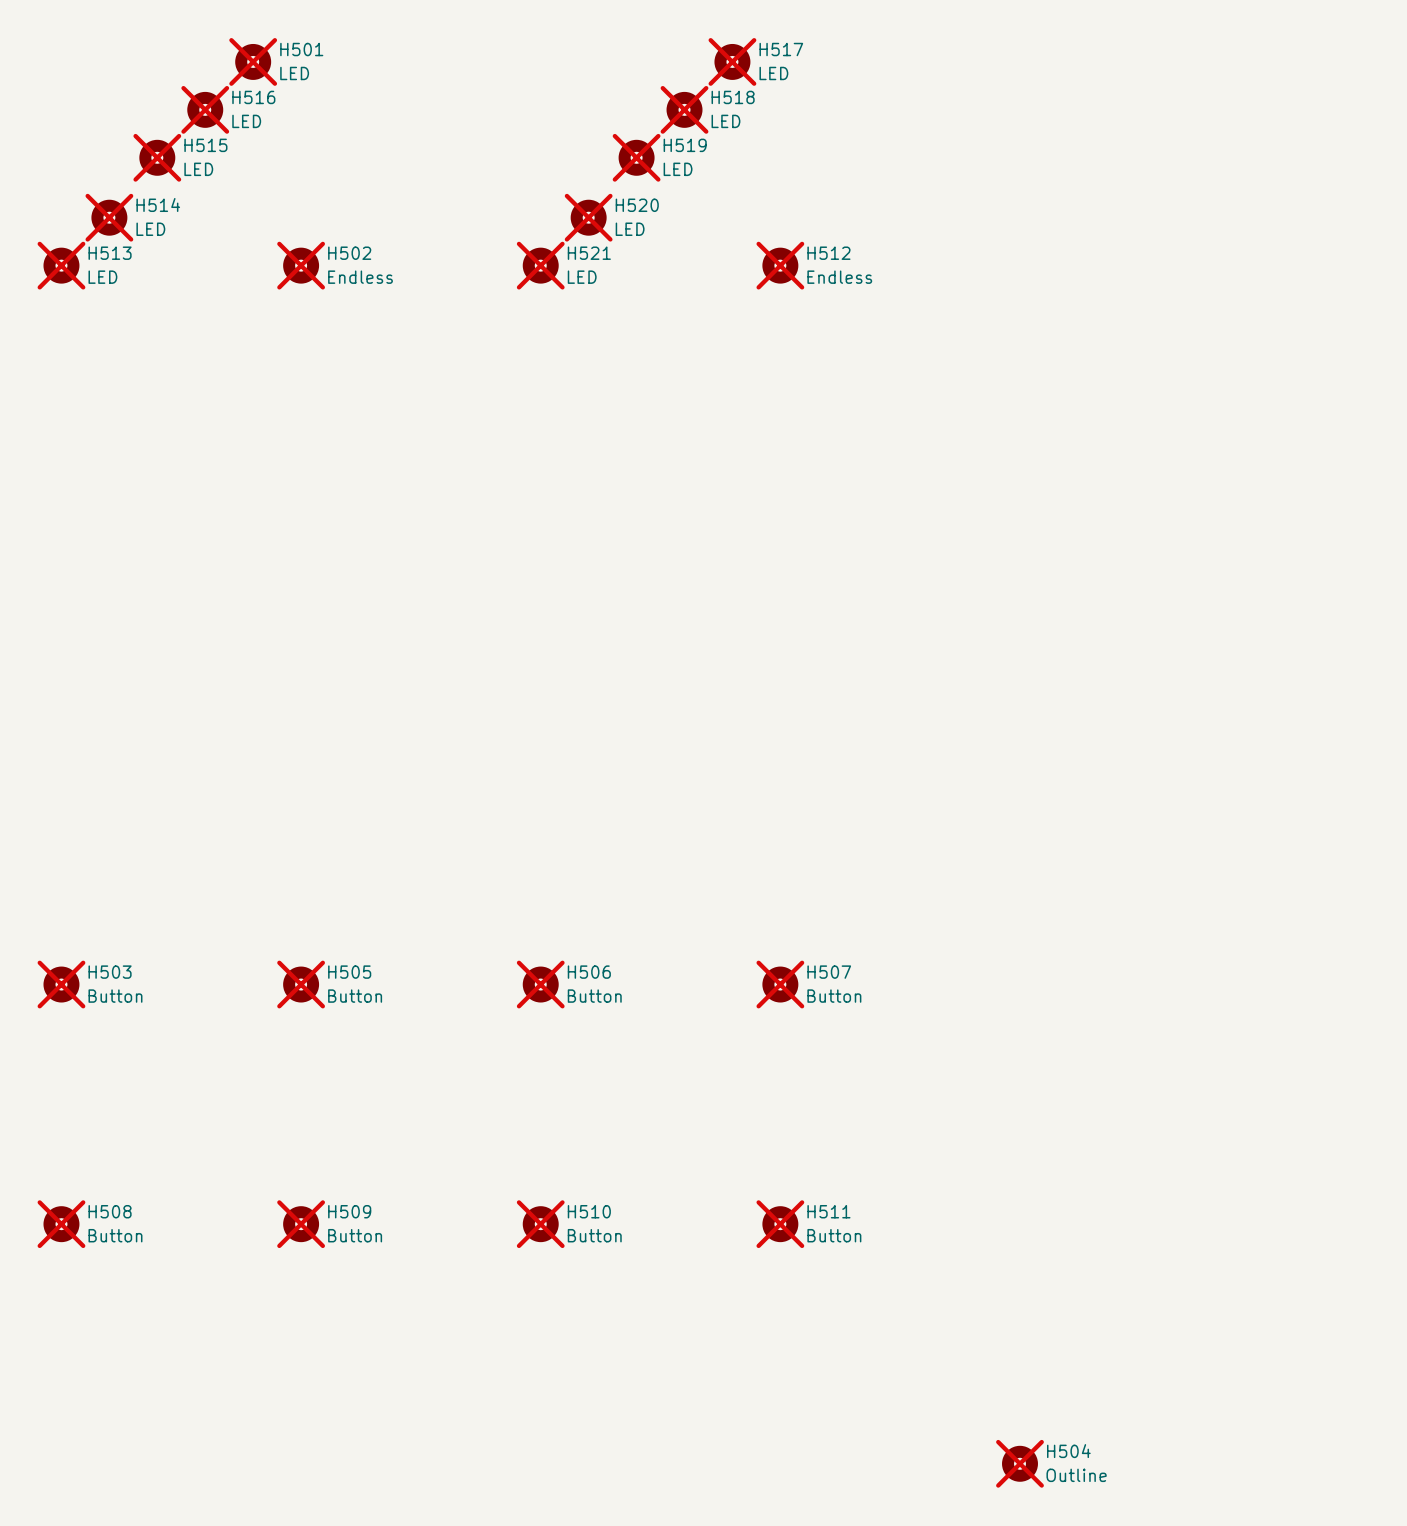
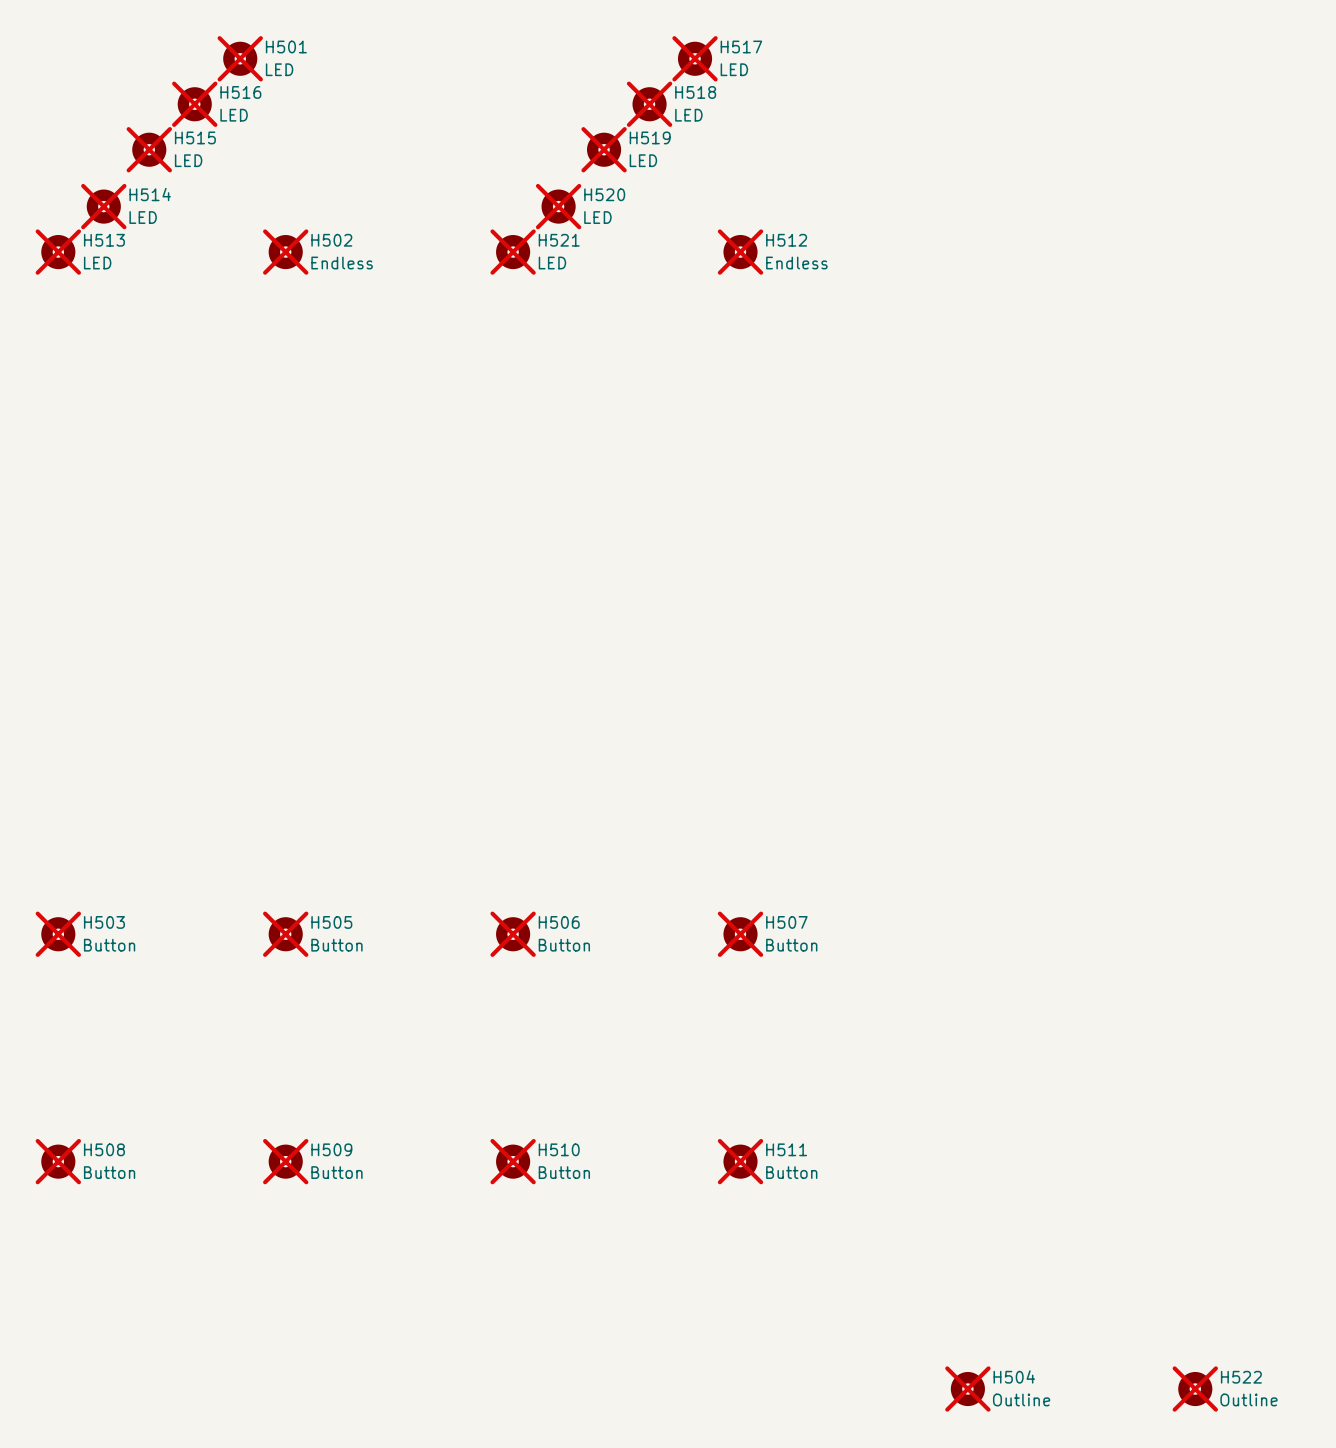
H522: none -> Outline (1195, 1389)

